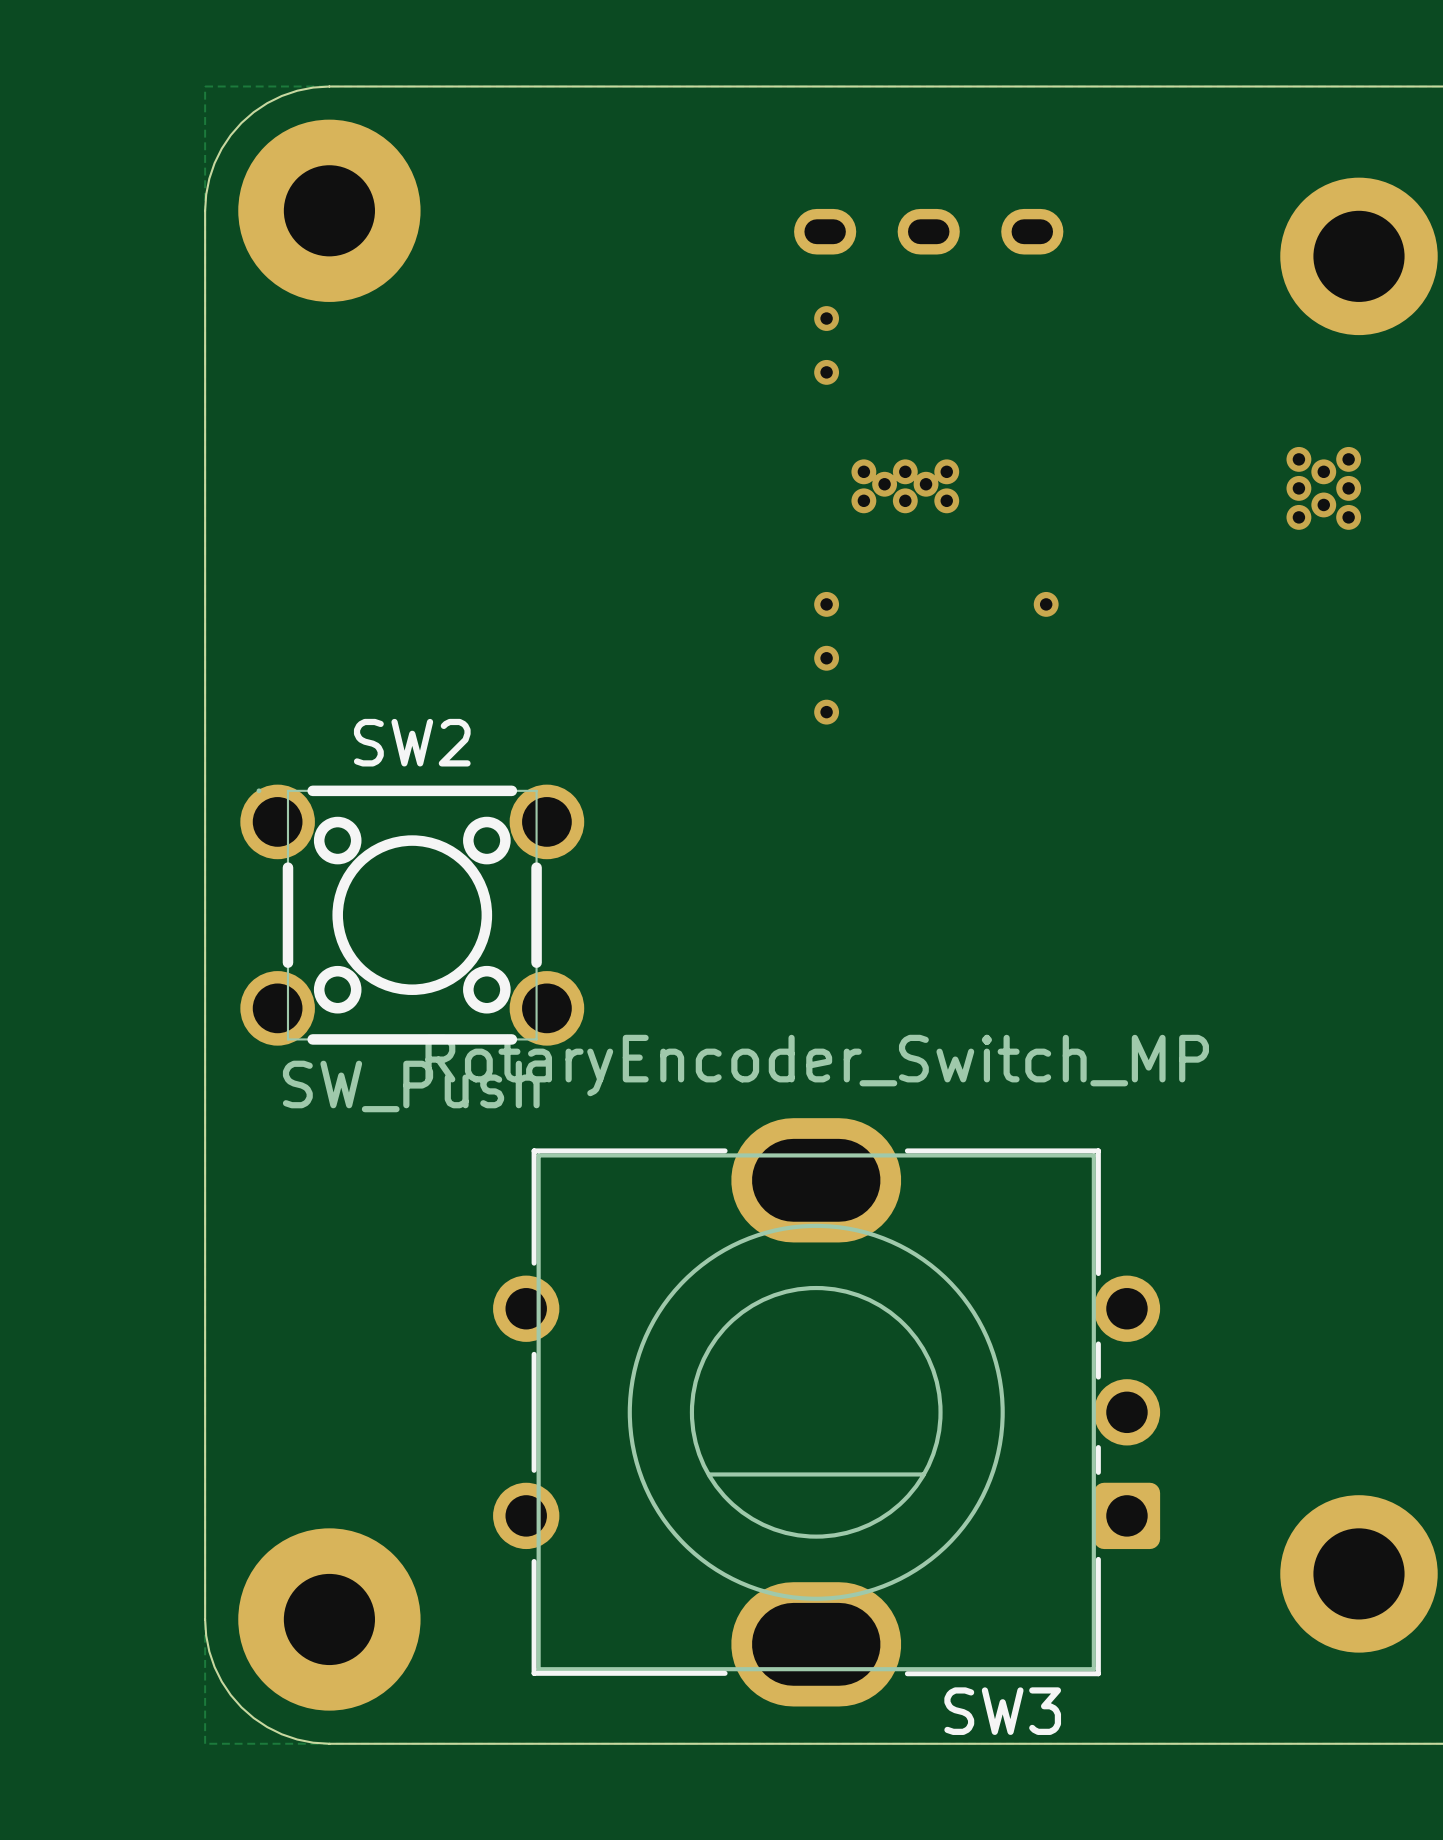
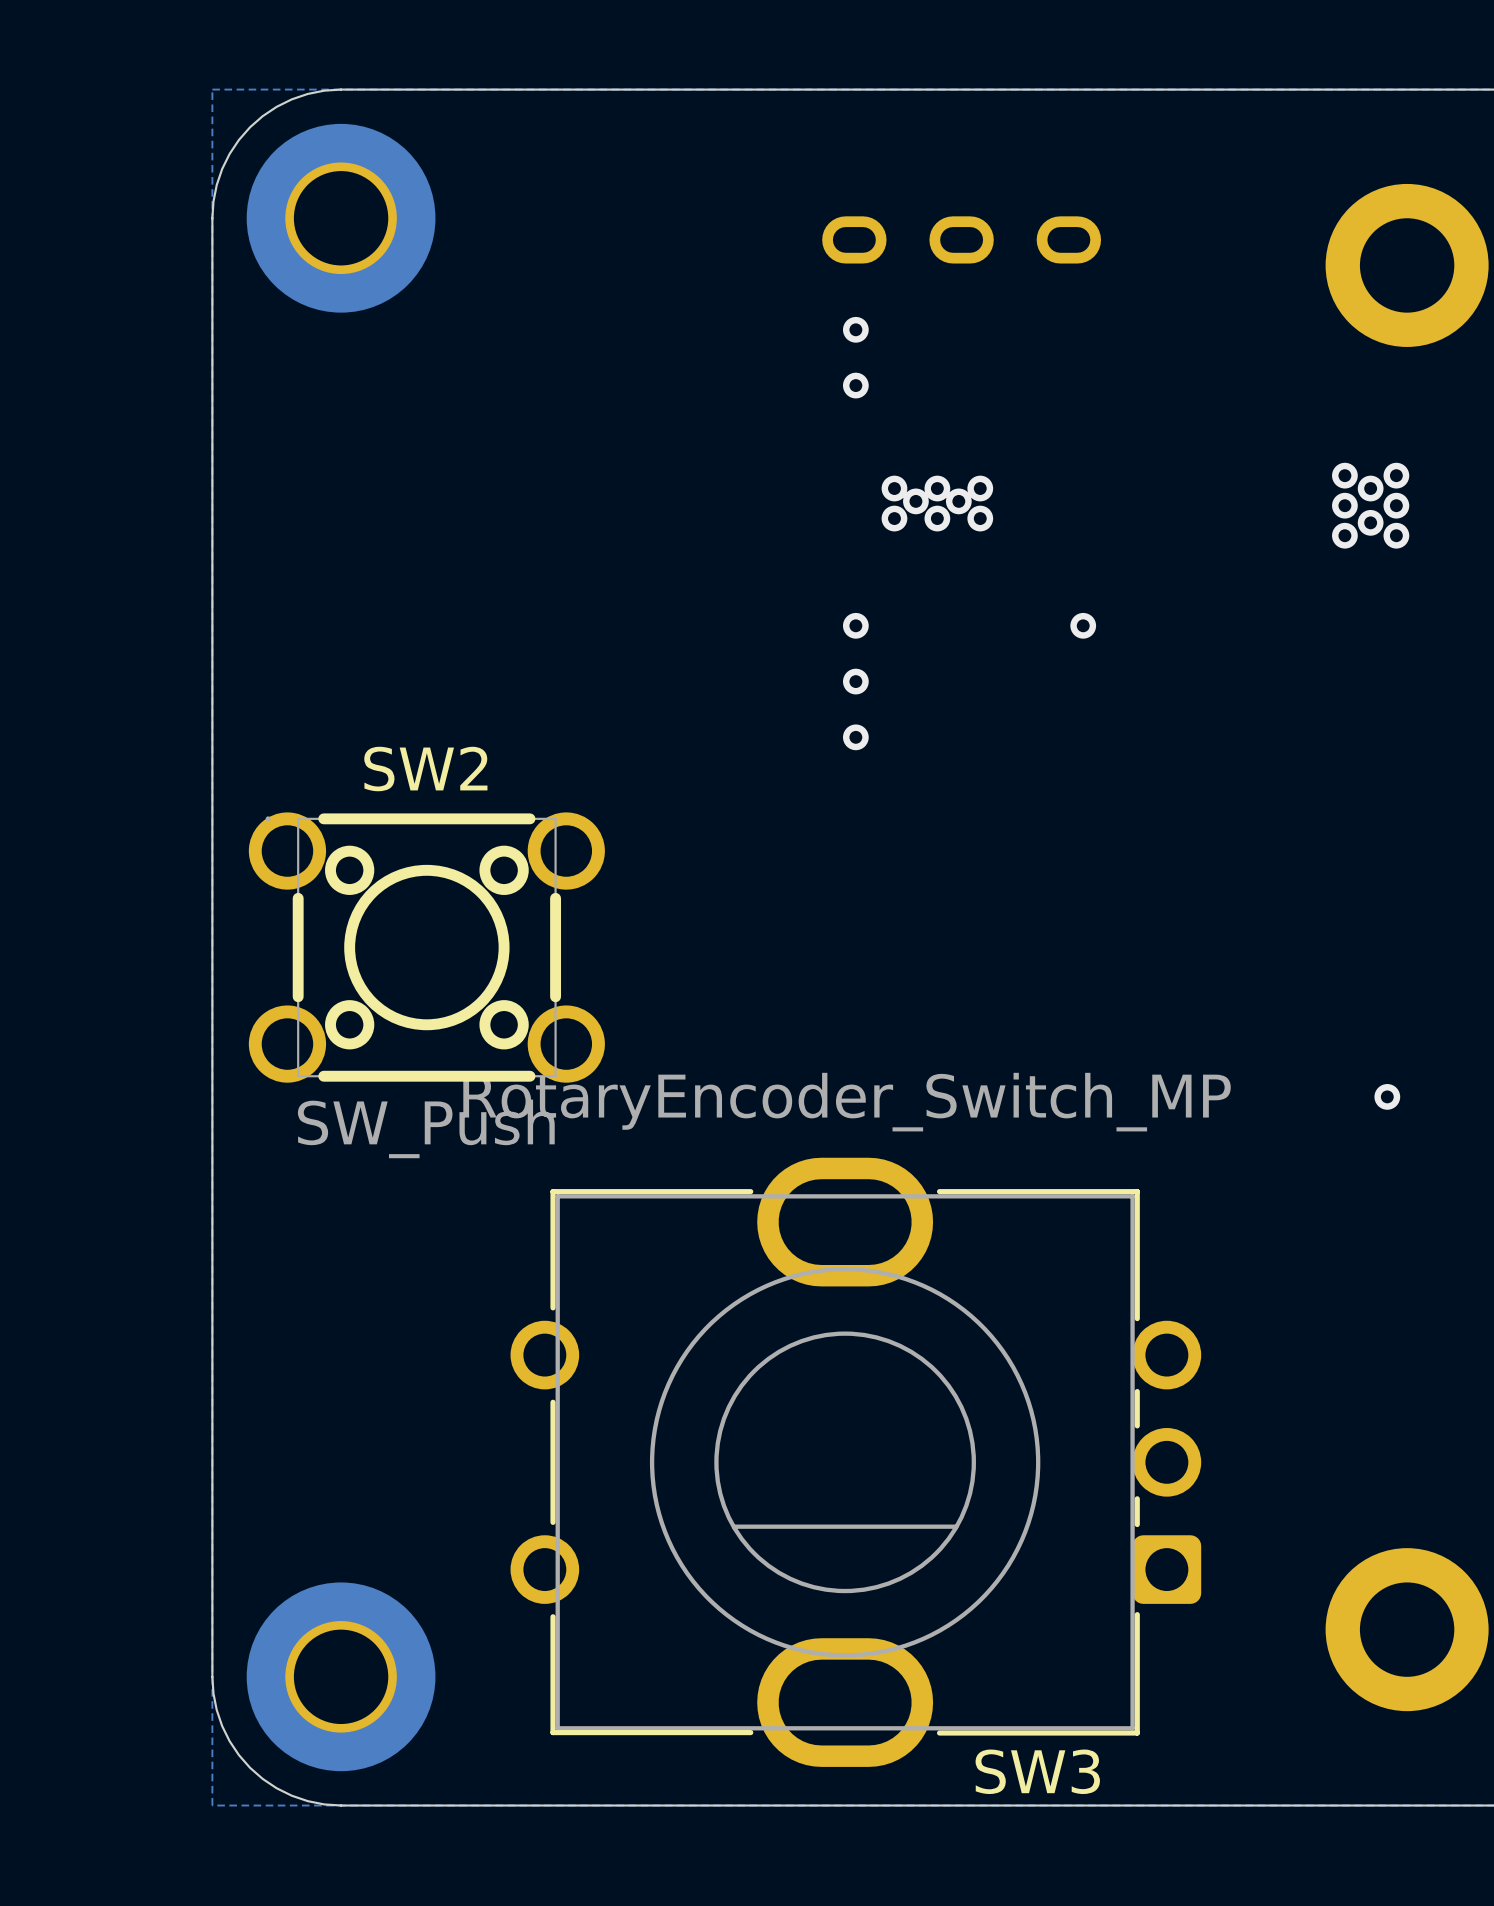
via: none -> (1387, 1096)

